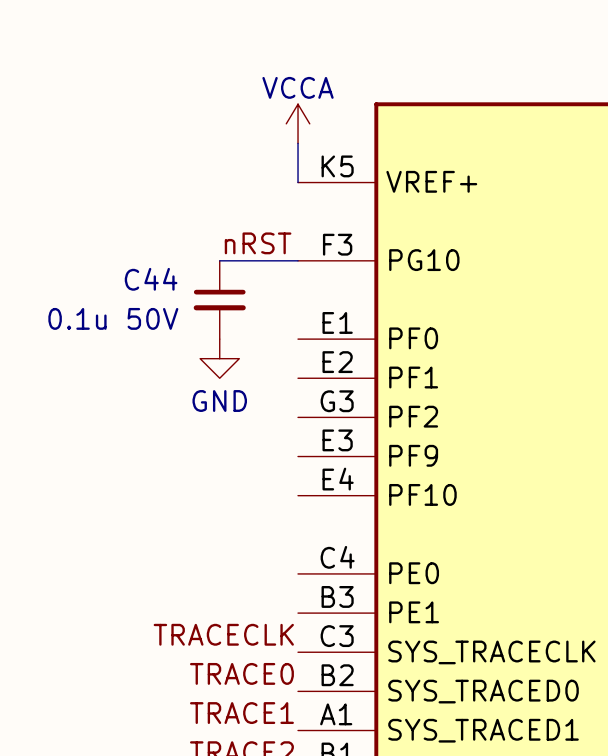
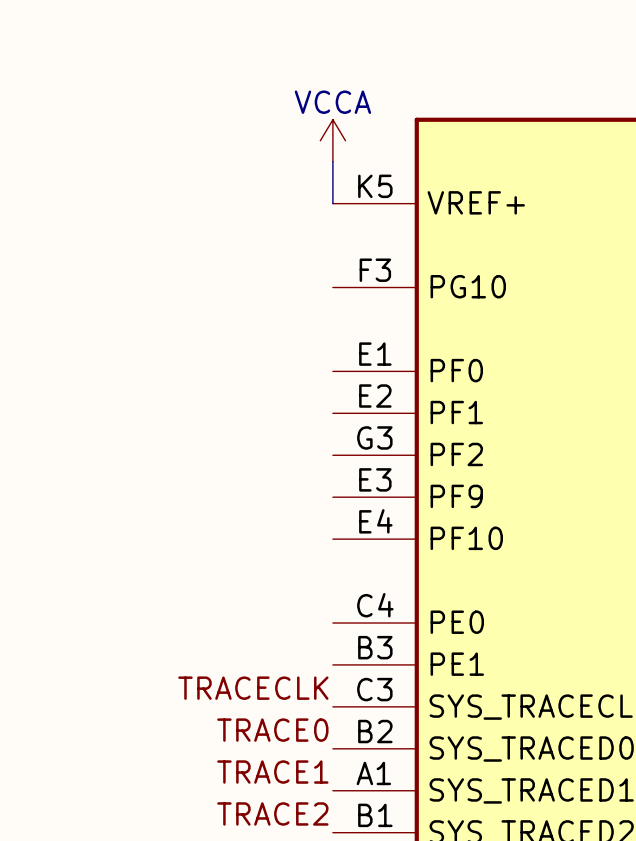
label: nRST (258, 243) -> none
wire: (219, 260) (298, 260) -> none
C44: 0.1u 50V (219, 299) -> none
power symbol: GND (219, 358) -> none

